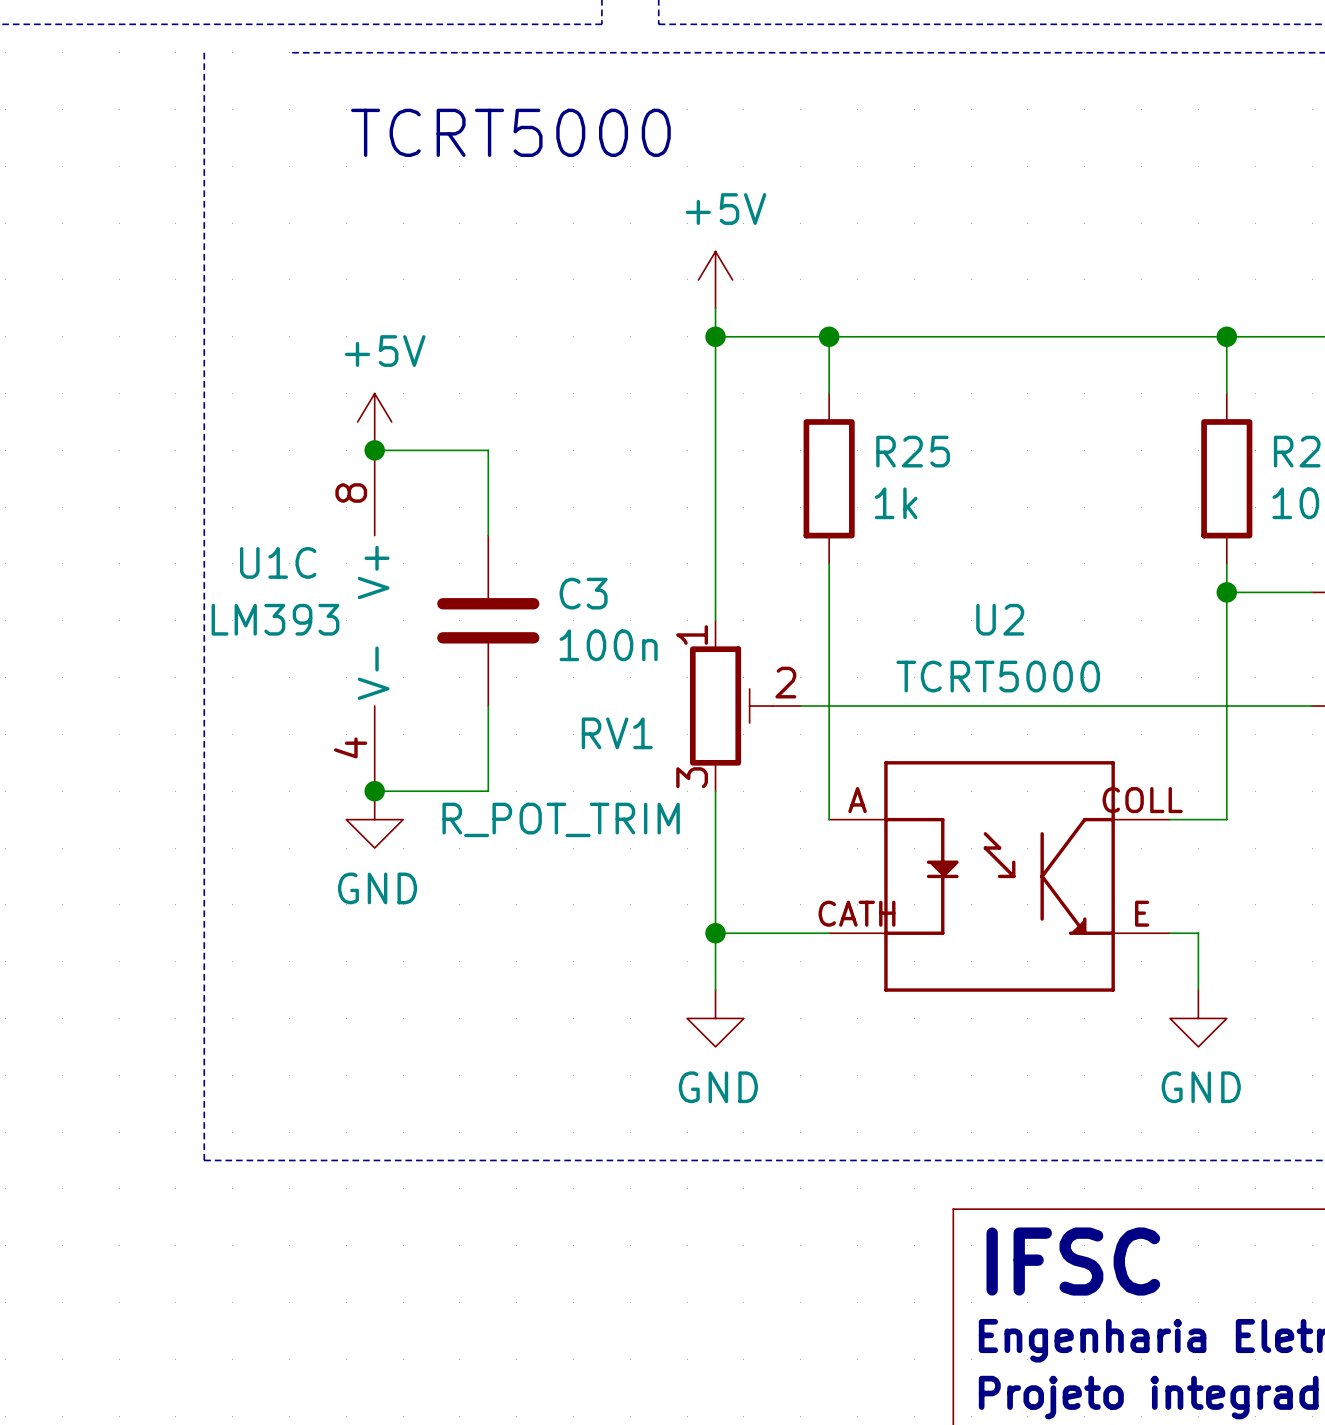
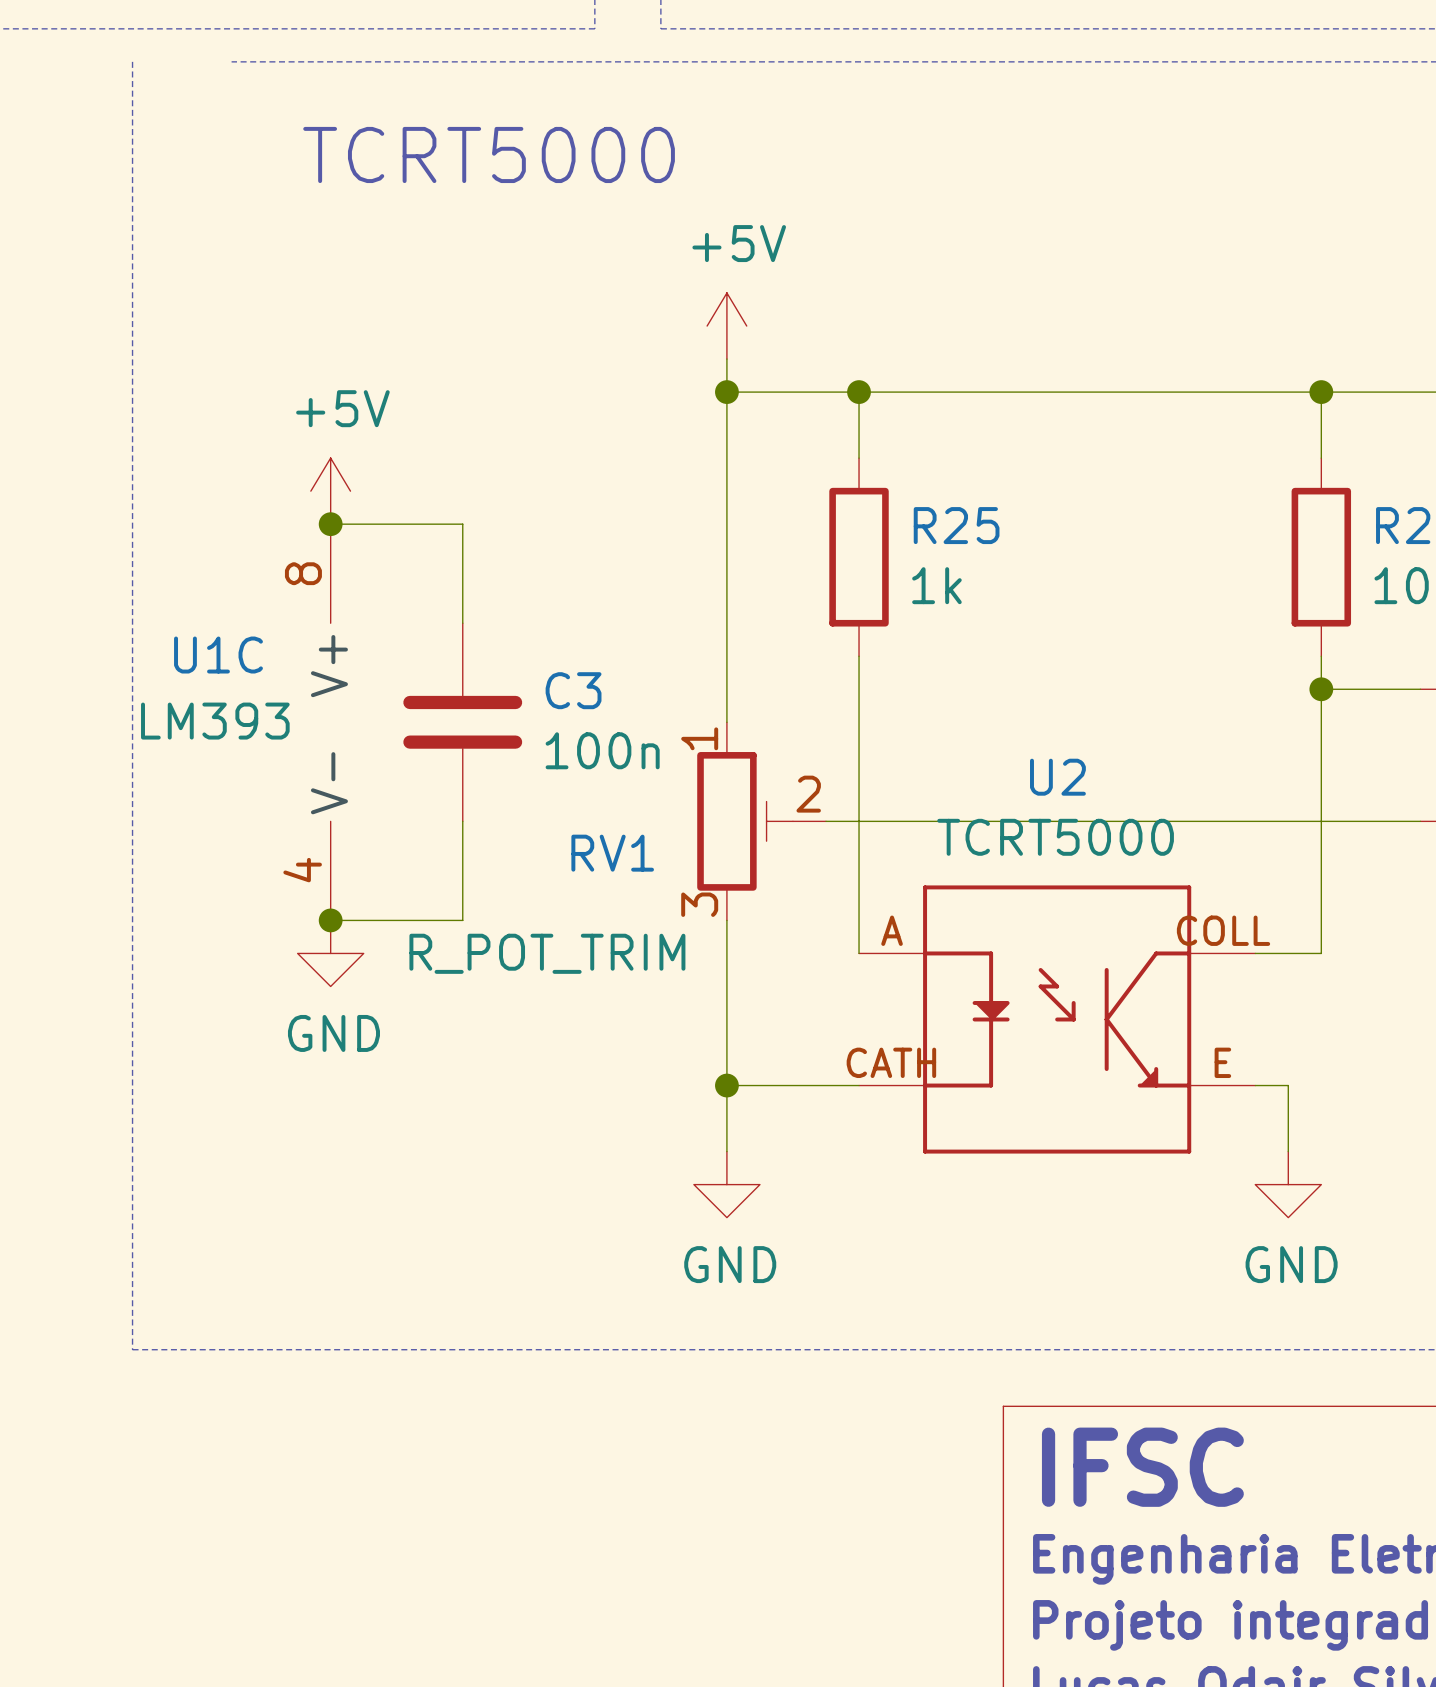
U2 name position: U2 (1000, 619) -> U2 (1057, 777)
U2 value position: TCRT5000 (998, 676) -> TCRT5000 (1055, 837)

